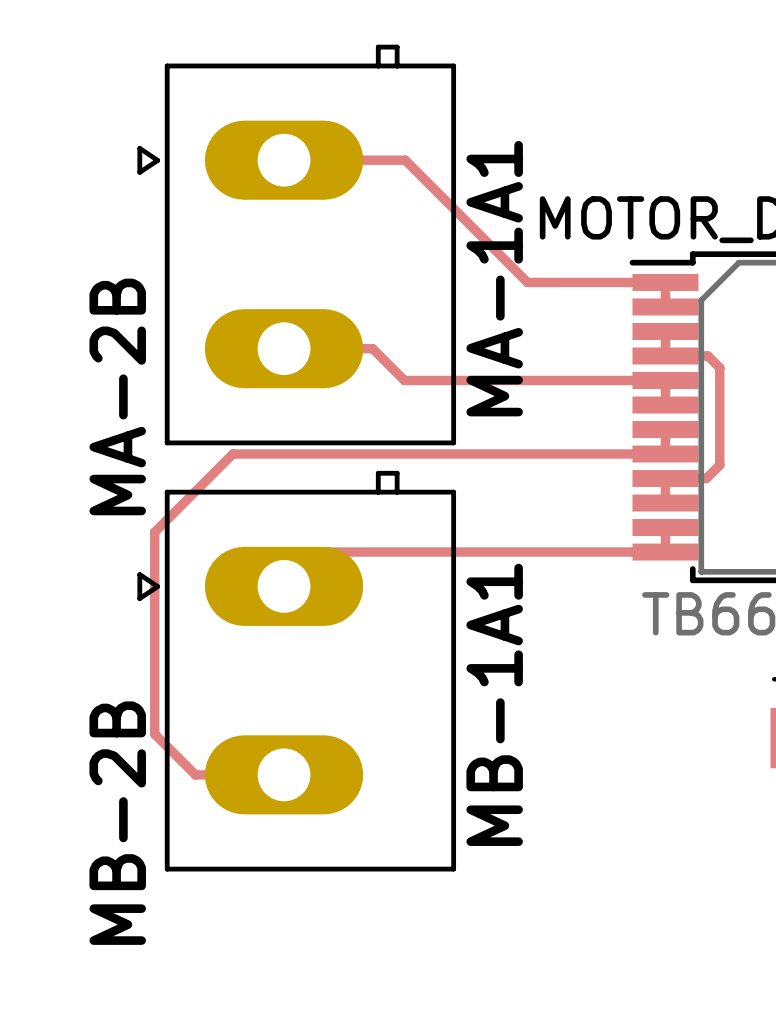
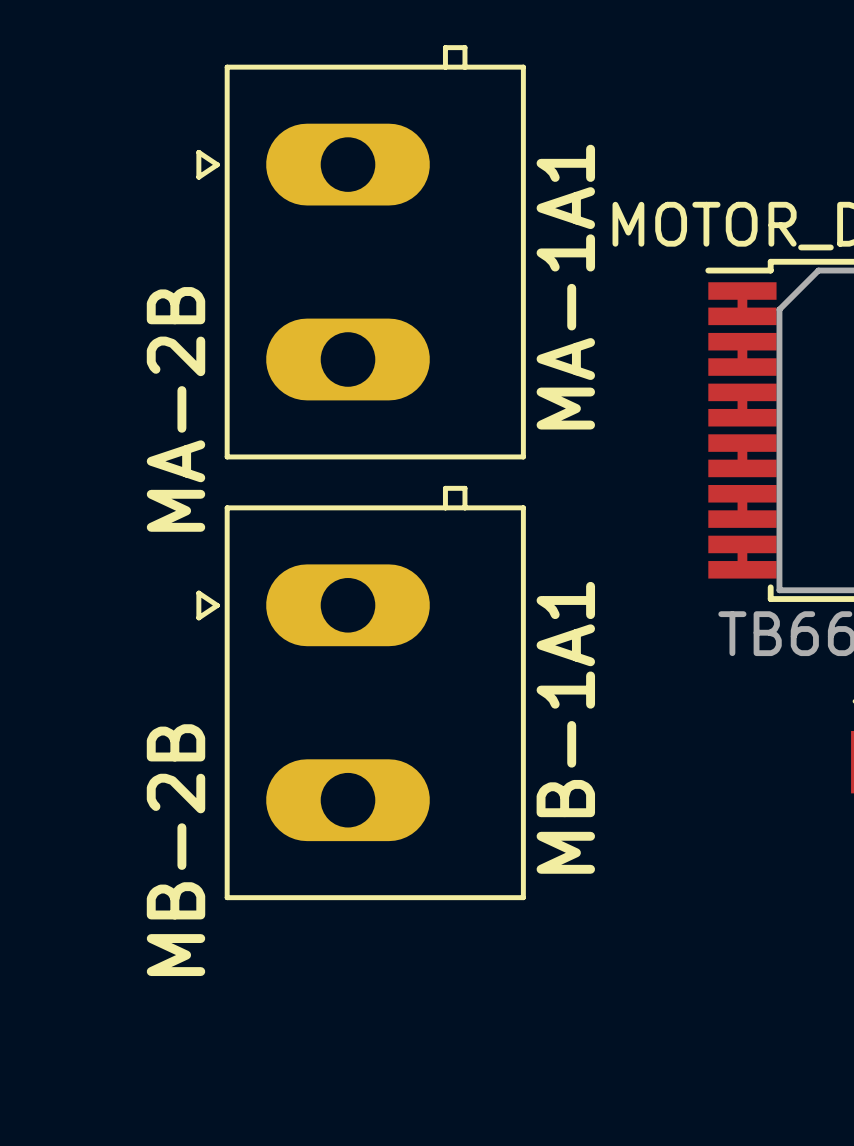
track: (284, 160) (405, 160) (527, 282) (665, 282) -> none
track: (284, 348) (372, 348) (404, 380) (665, 380) -> none
track: (665, 355) (707, 355) (719, 367) (719, 465) (706, 478) (665, 478) -> none
track: (665, 454) (232, 454) (154, 532) (154, 734) (195, 774) (284, 774) -> none
track: (665, 552) (318, 552) (284, 586) -> none

